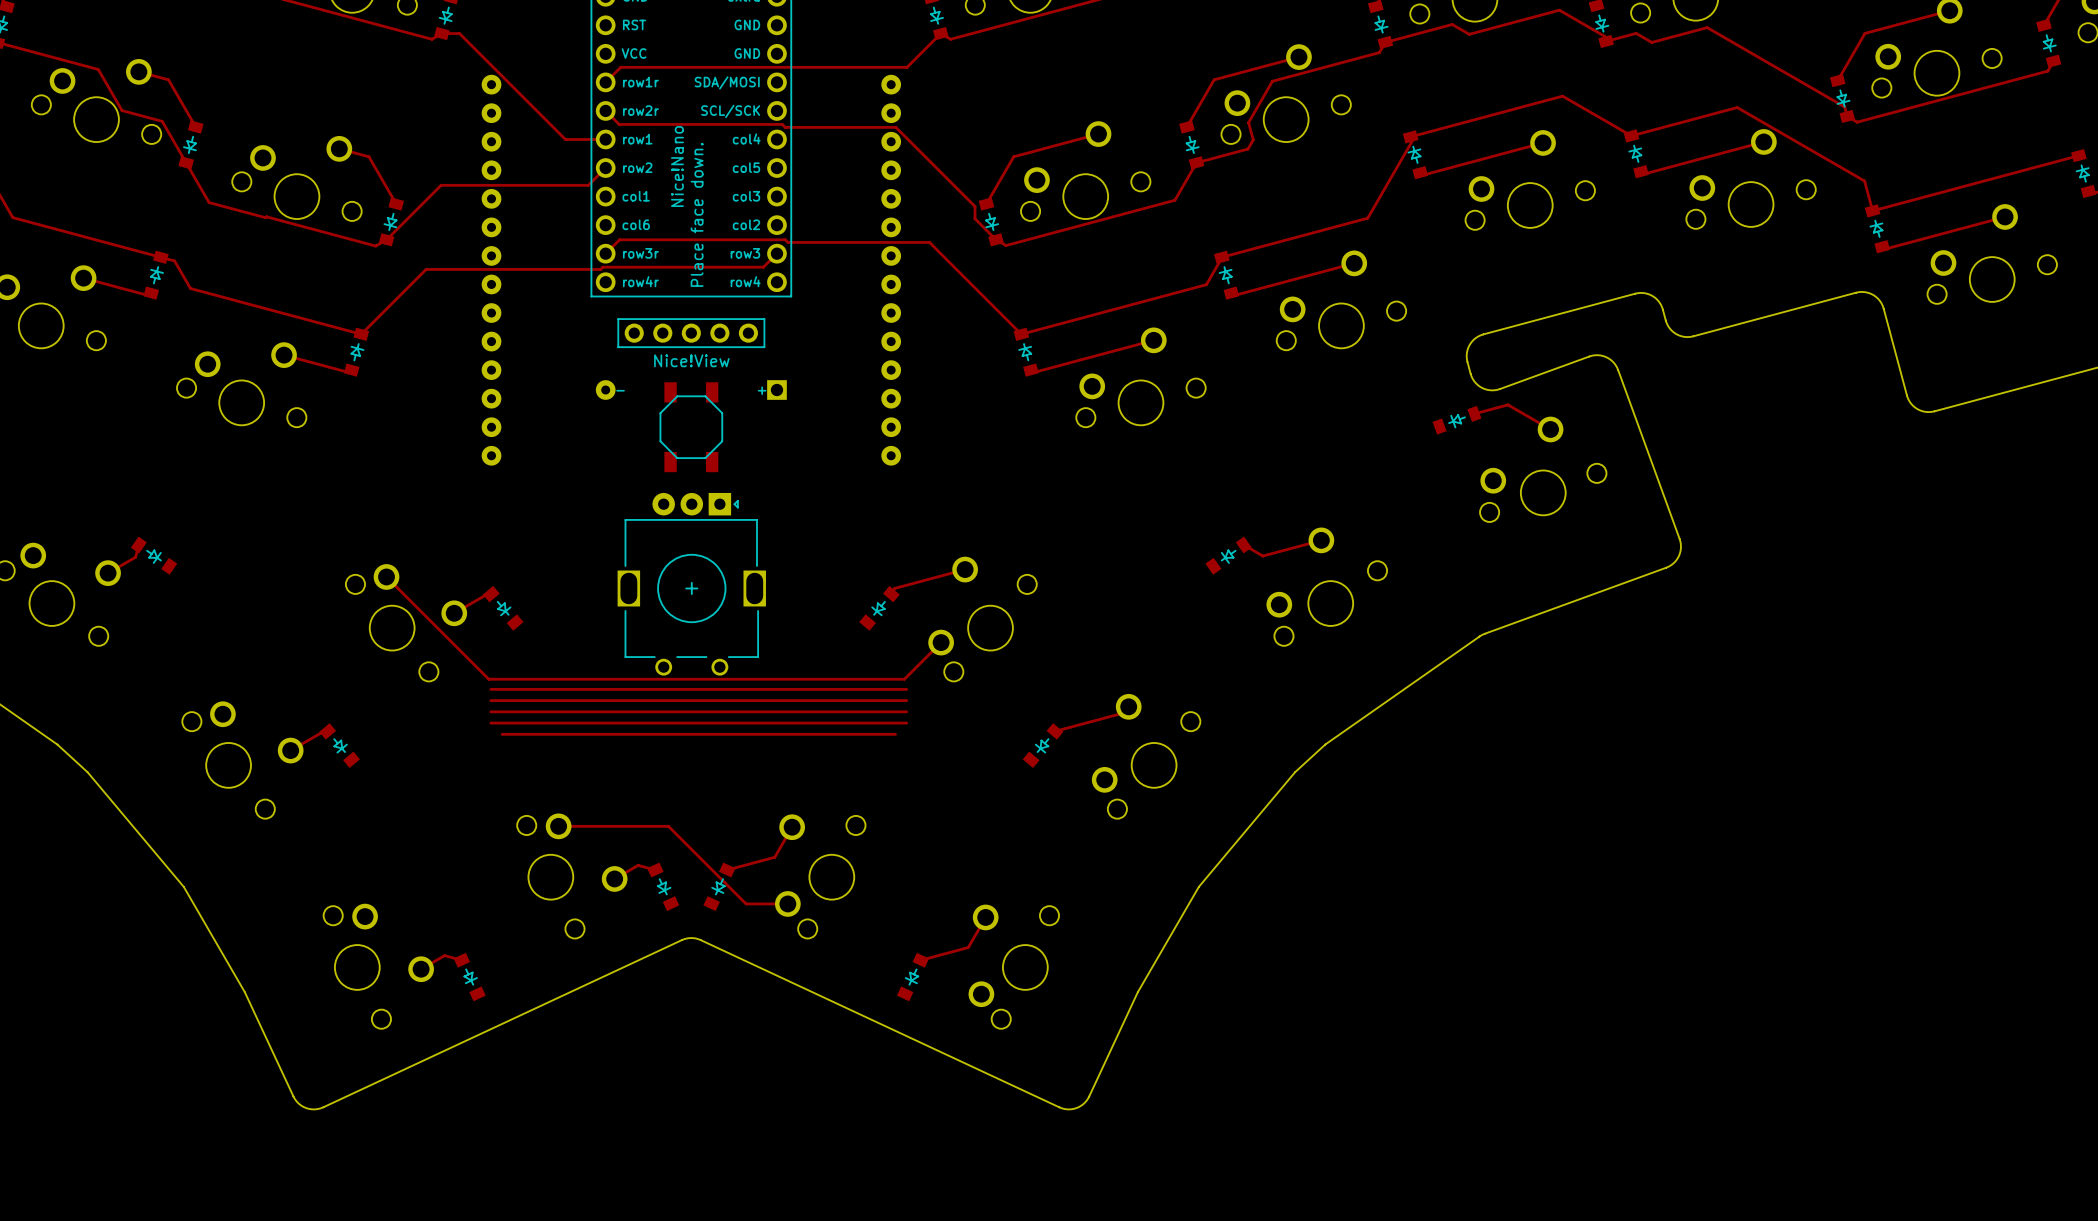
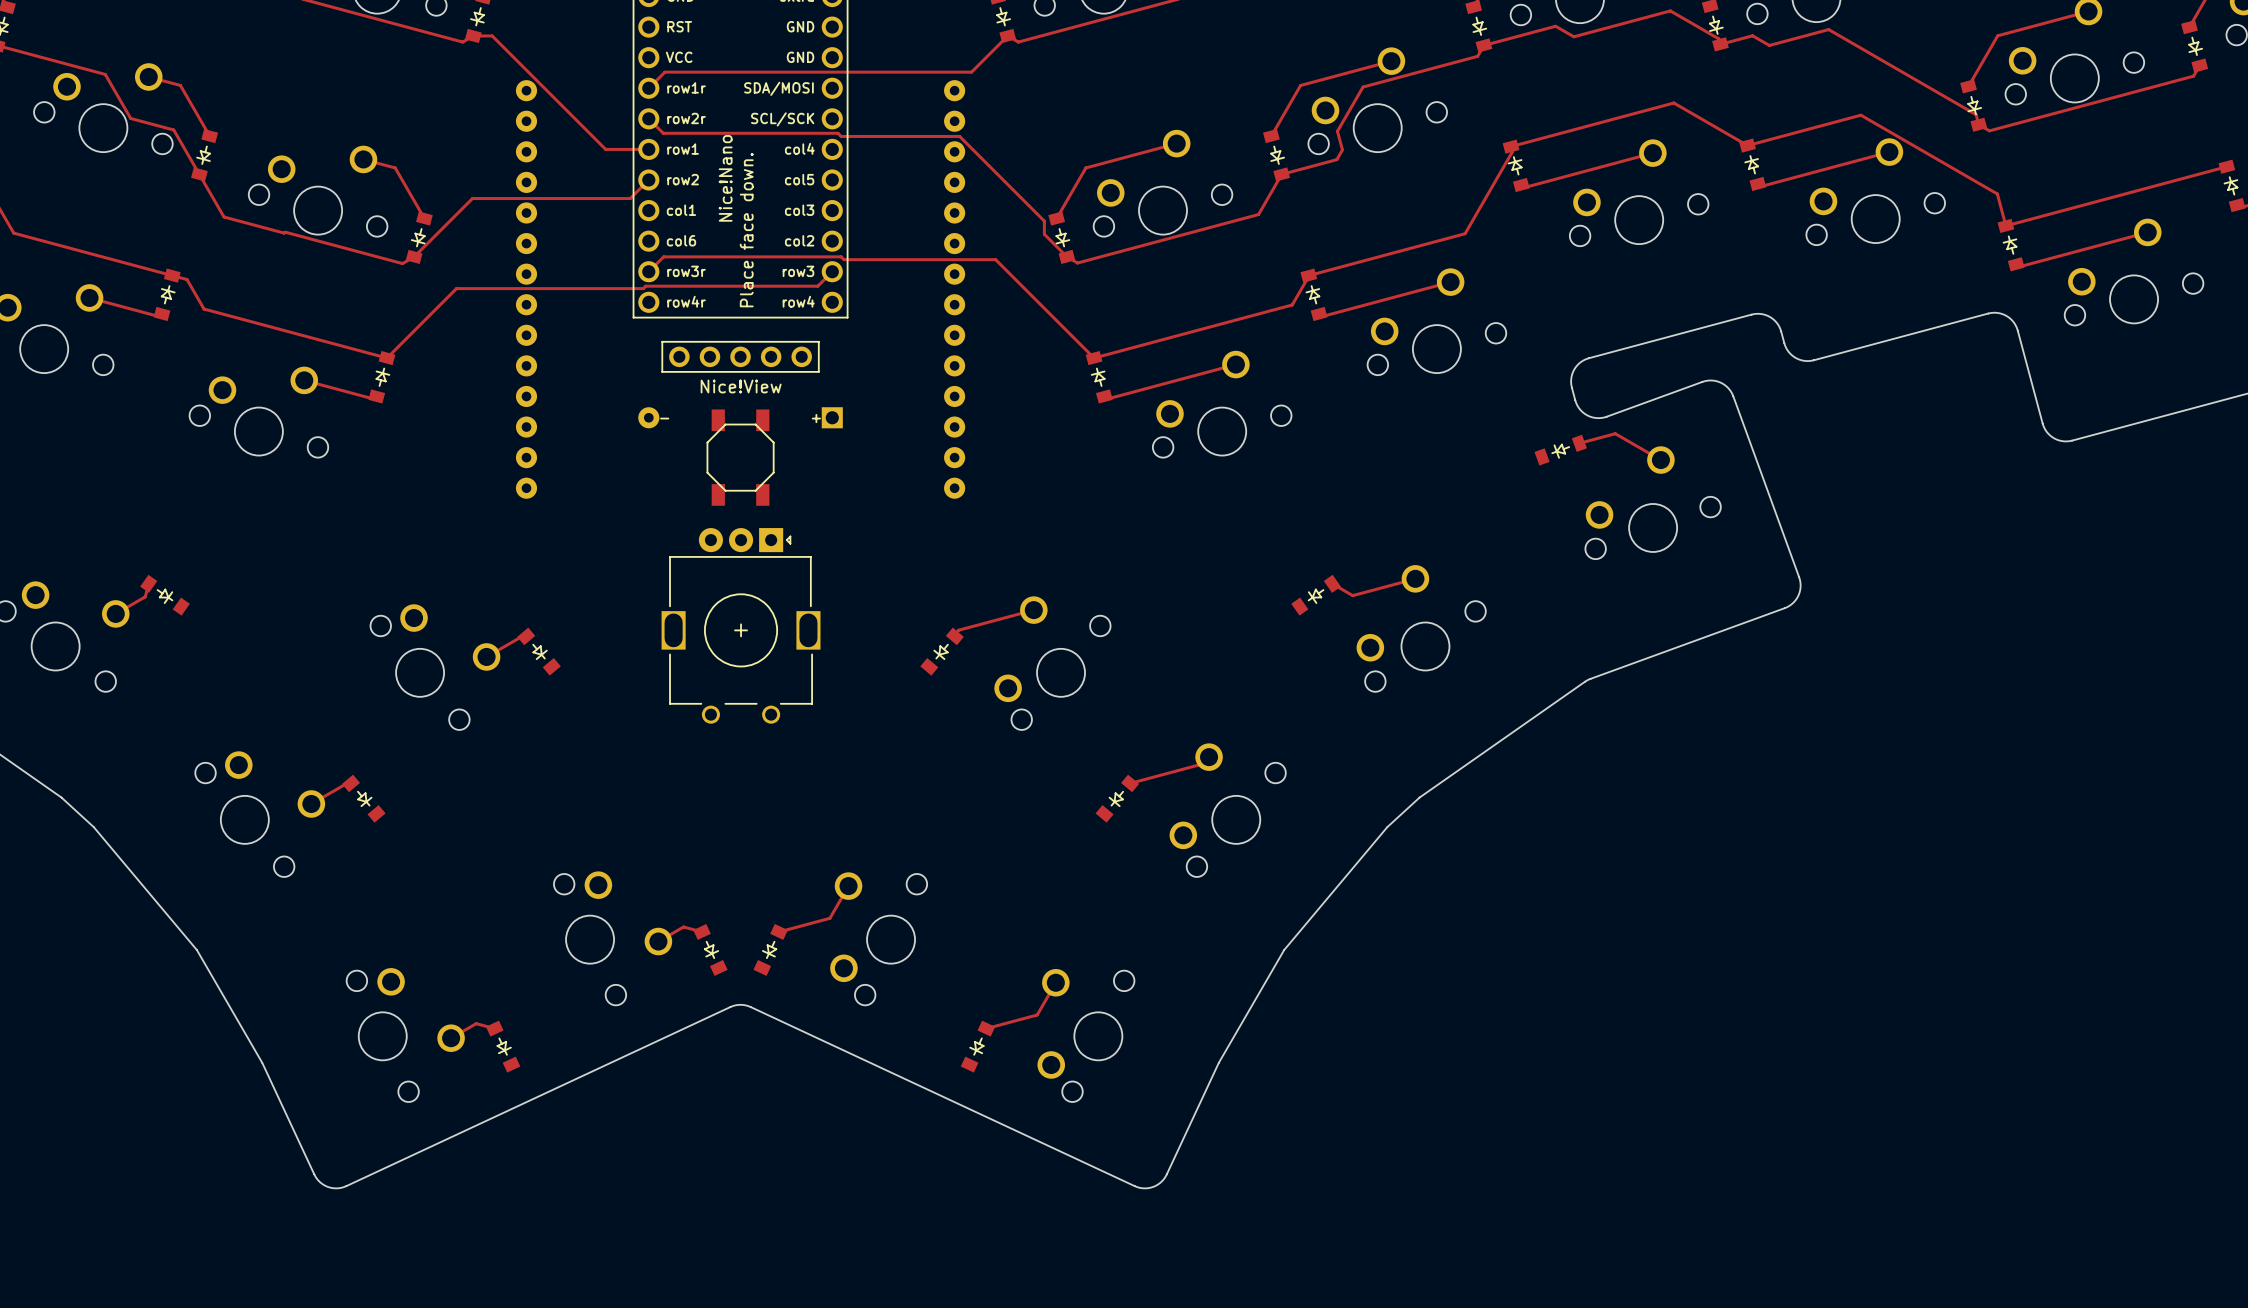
track: (386, 576) (488, 679) (904, 679) (941, 642) -> none
track: (490, 689) (906, 689) -> none
track: (490, 700) (906, 700) -> none
track: (490, 711) (906, 711) -> none
track: (490, 723) (906, 723) -> none
track: (502, 734) (895, 734) -> none
track: (558, 826) (668, 826) (746, 903) (787, 903) -> none

